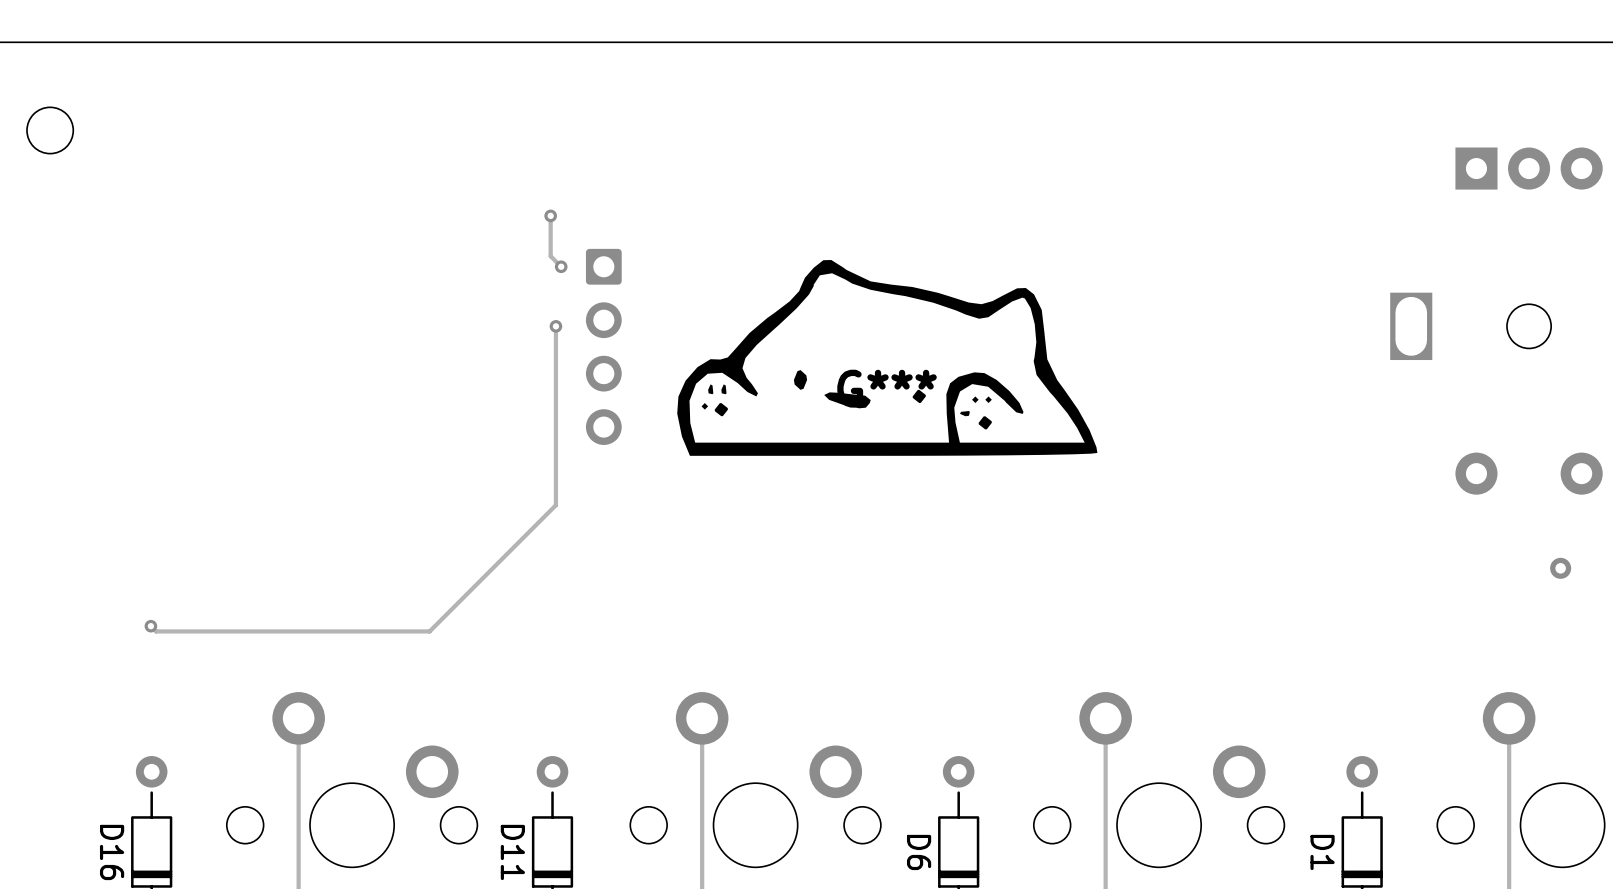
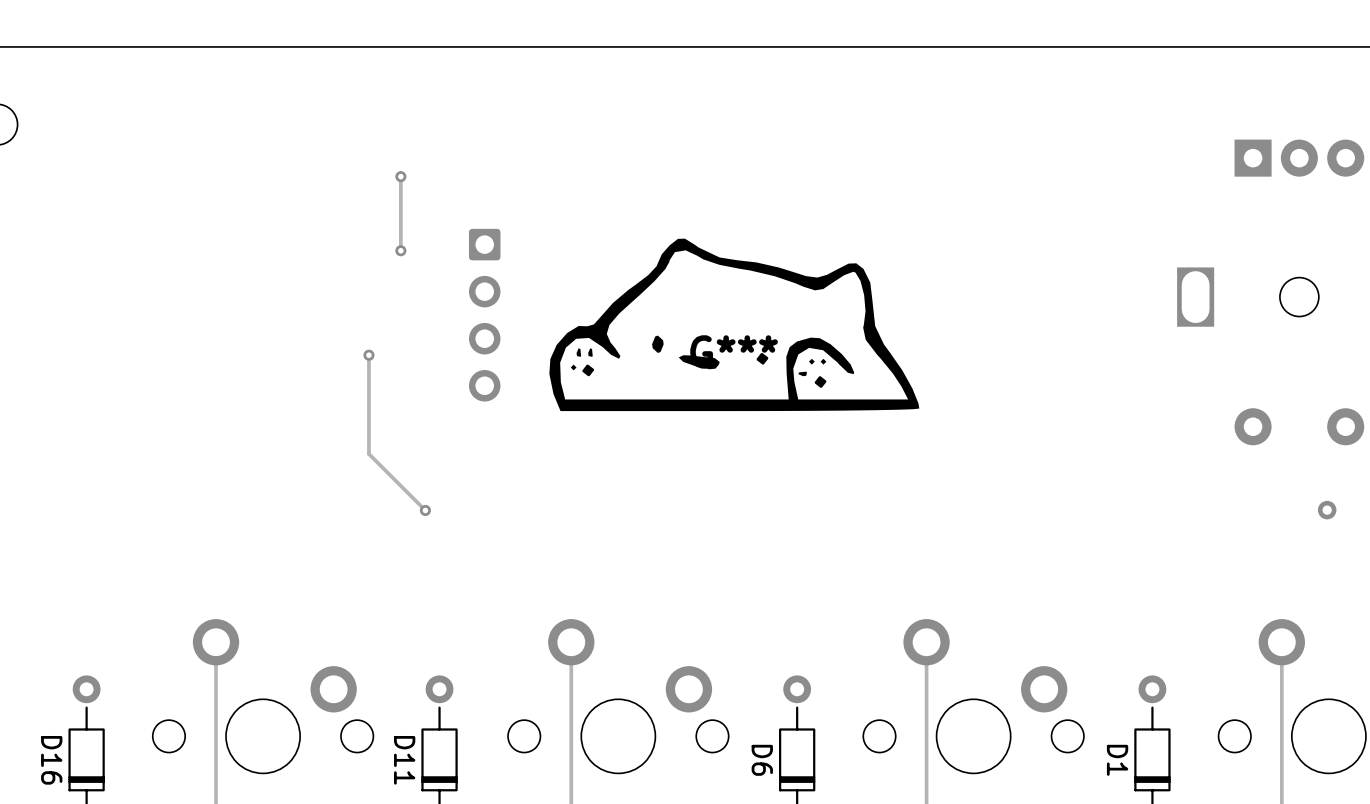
track: none -> (400, 176) (400, 250)
via: none -> (400, 176)
track: (550, 215) (550, 256) (561, 266) -> none
via: (550, 215) -> none
via: (561, 266) -> none
via: none -> (400, 250)
track: (555, 326) (555, 505) (429, 631) (156, 631) (150, 626) -> none
via: (555, 326) -> none
track: none -> (368, 355) (368, 454) (425, 510)
via: none -> (368, 355)
via: none -> (425, 510)
via: (150, 626) -> none

